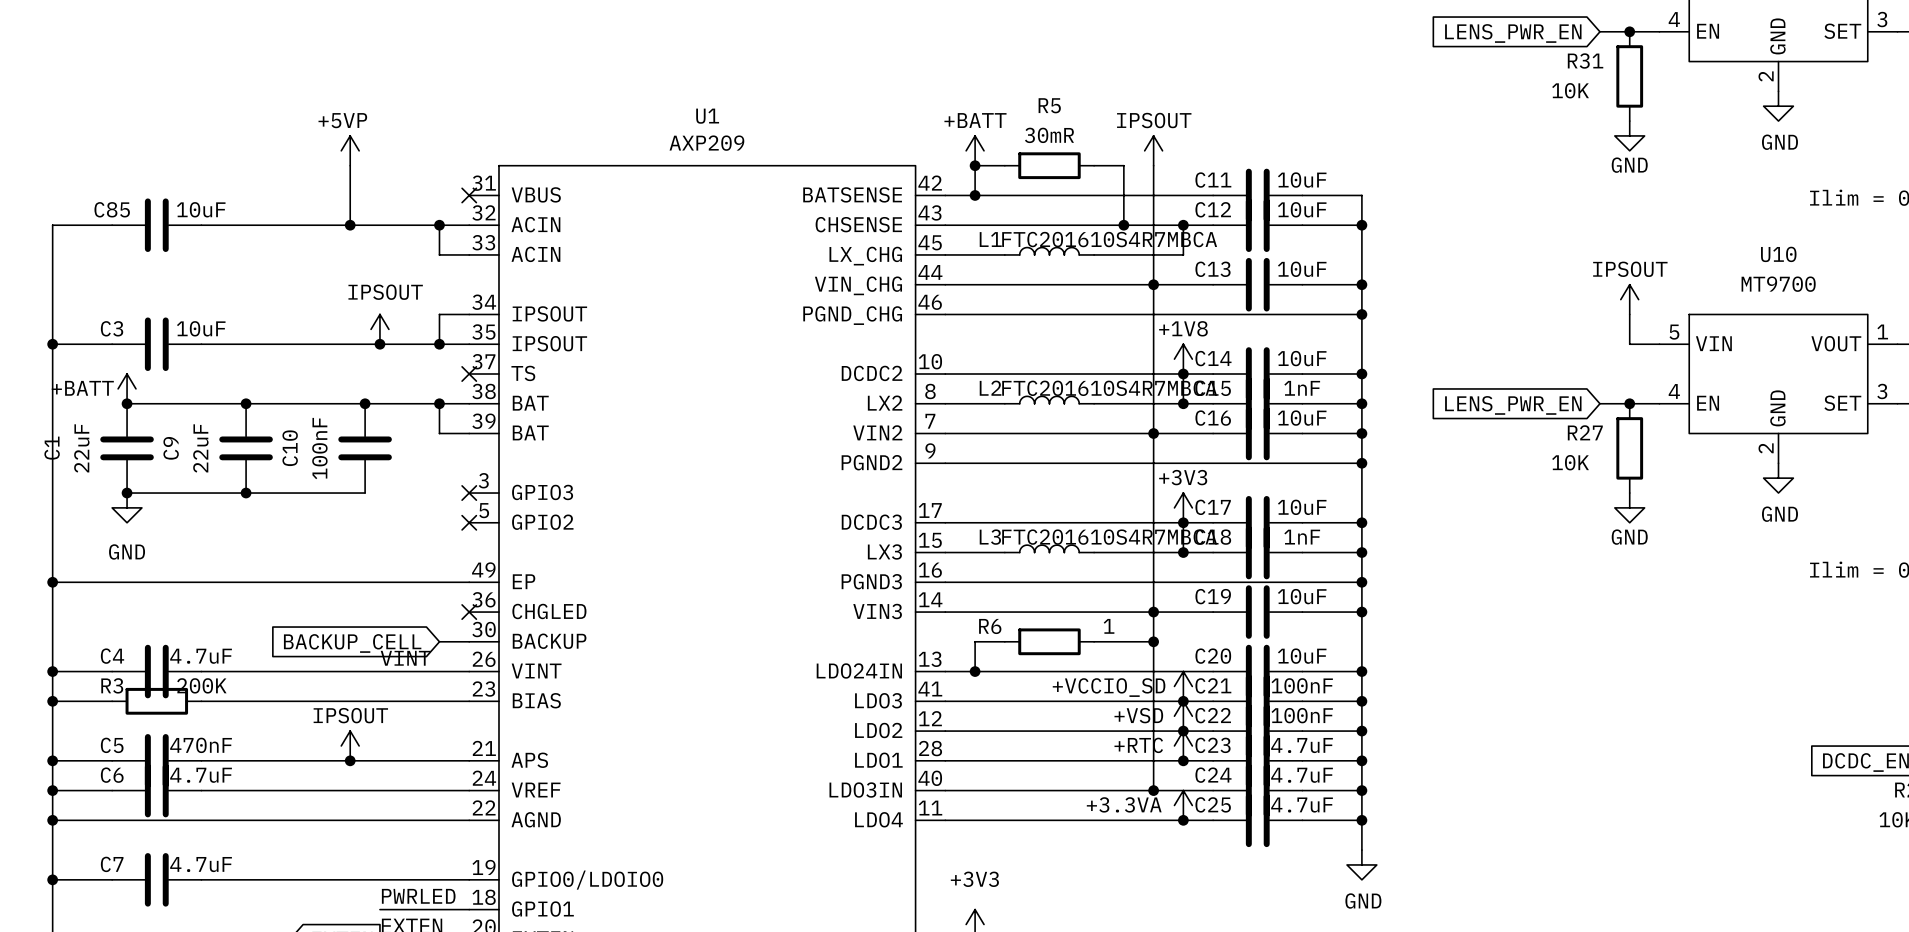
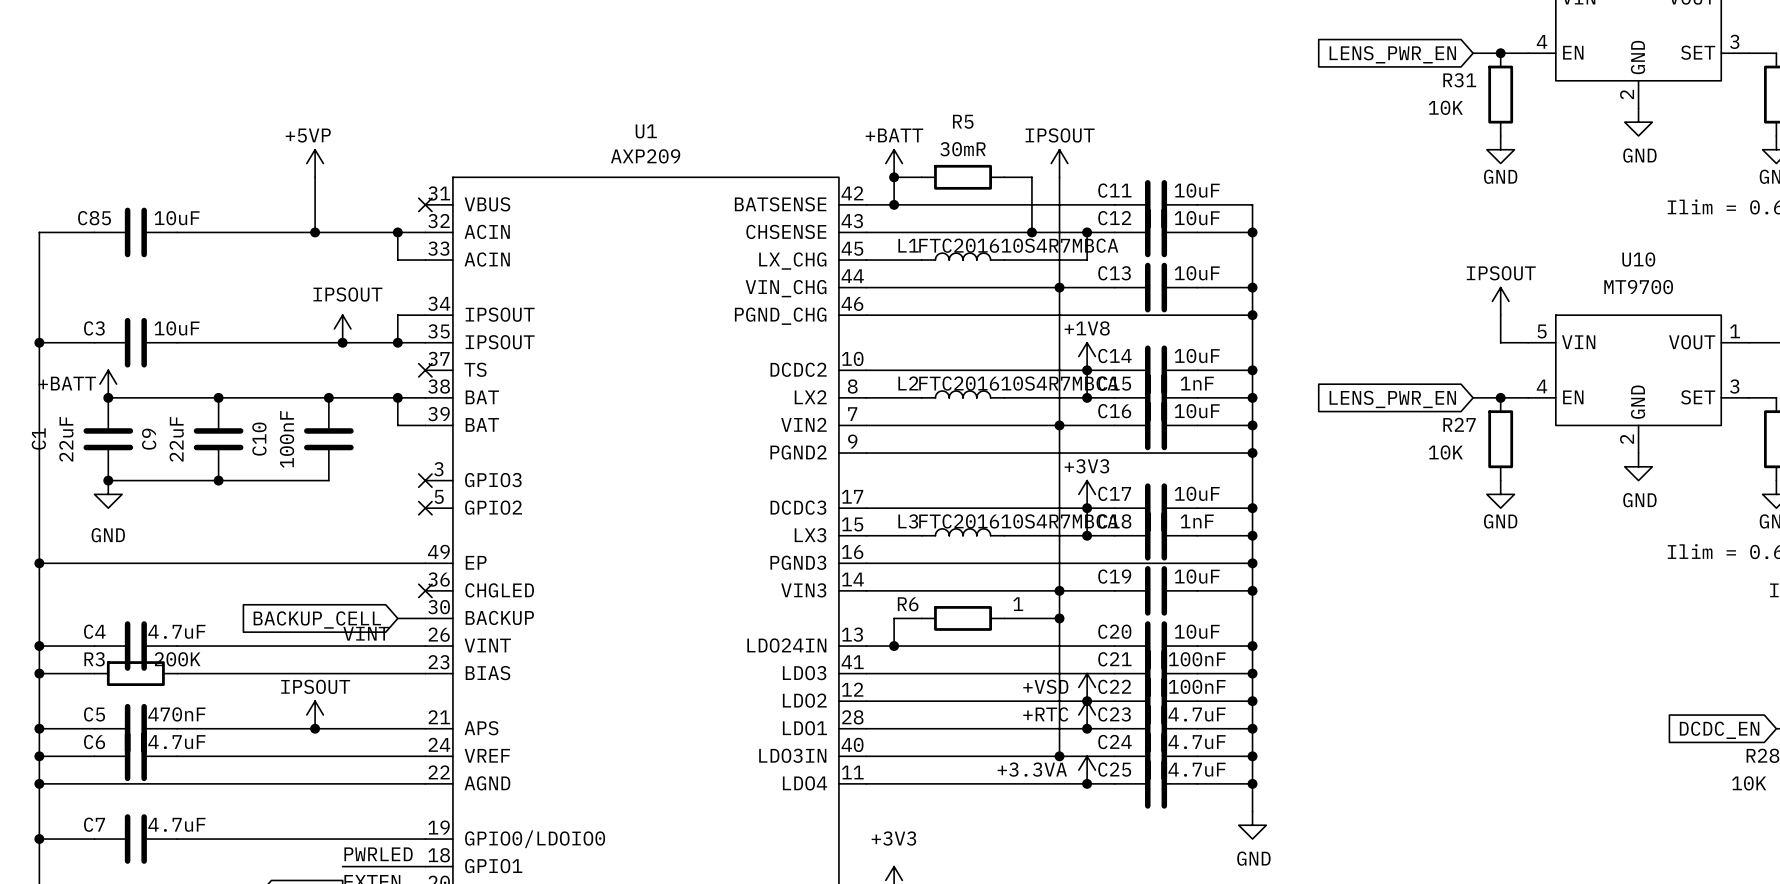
power symbol: +VCCIO_SD (1183, 686) -> none
junction: (1183, 701) -> none

